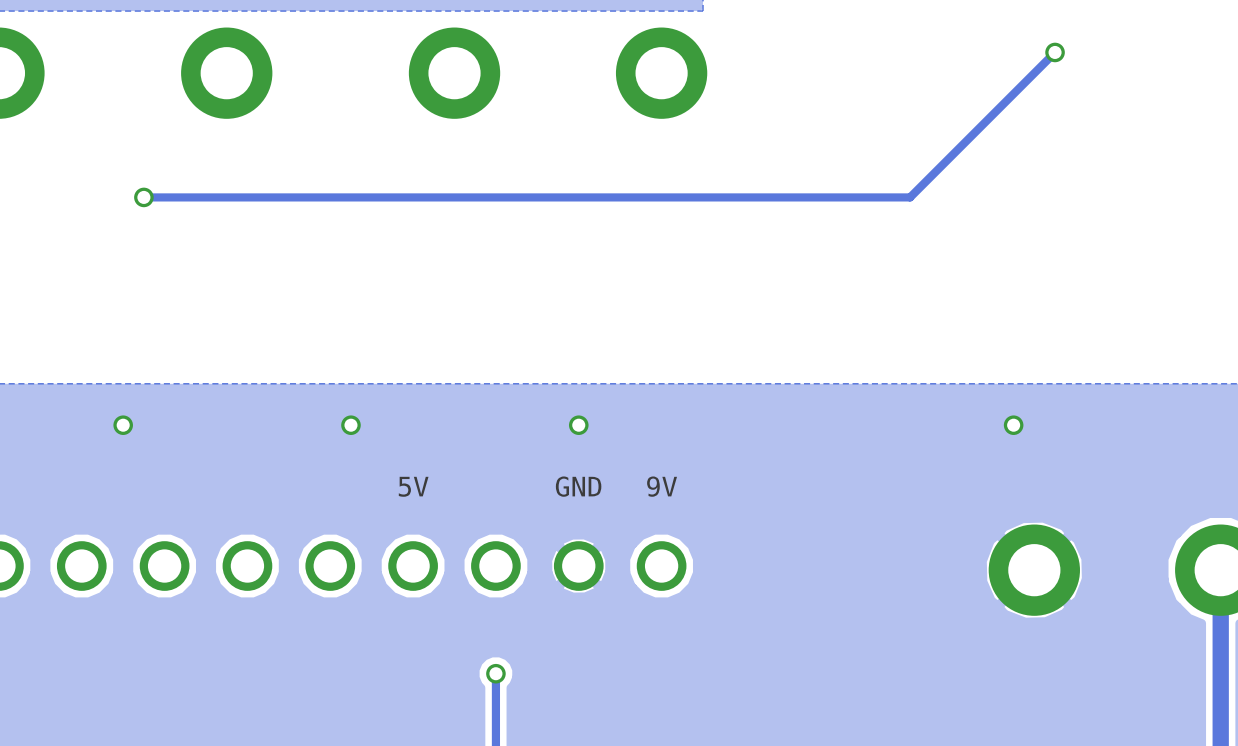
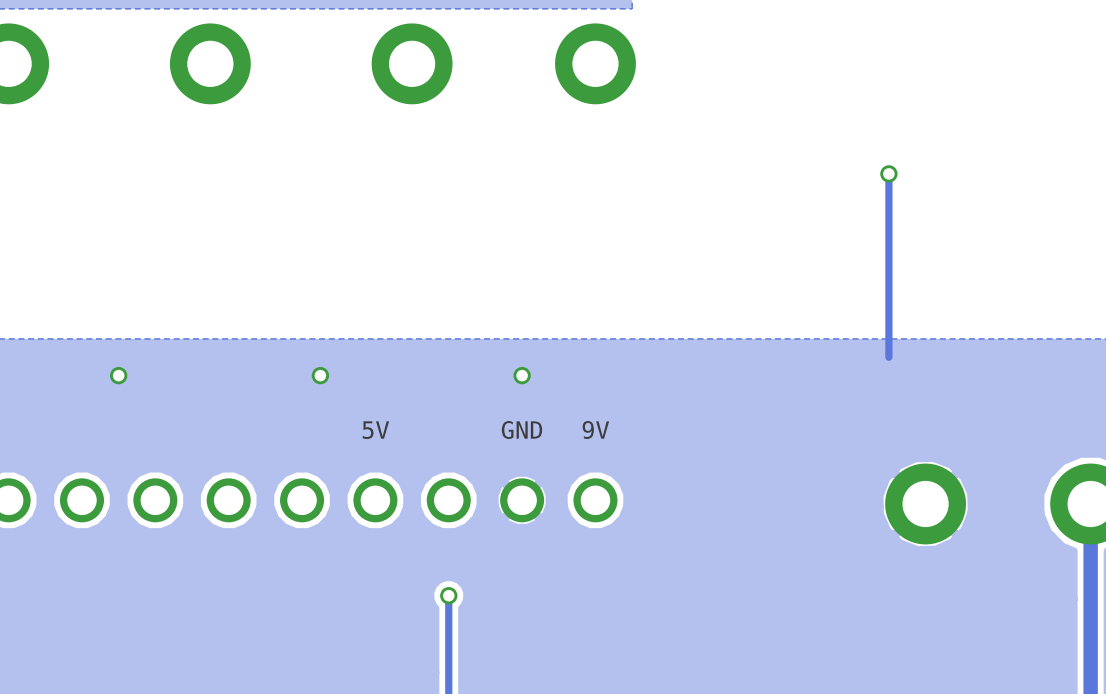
track: (1055, 52) (910, 197) (143, 197) -> none
via: (1055, 52) -> none
via: (143, 197) -> none
track: none -> (888, 173) (888, 357)
via: none -> (888, 173)
via: (1013, 425) -> none

